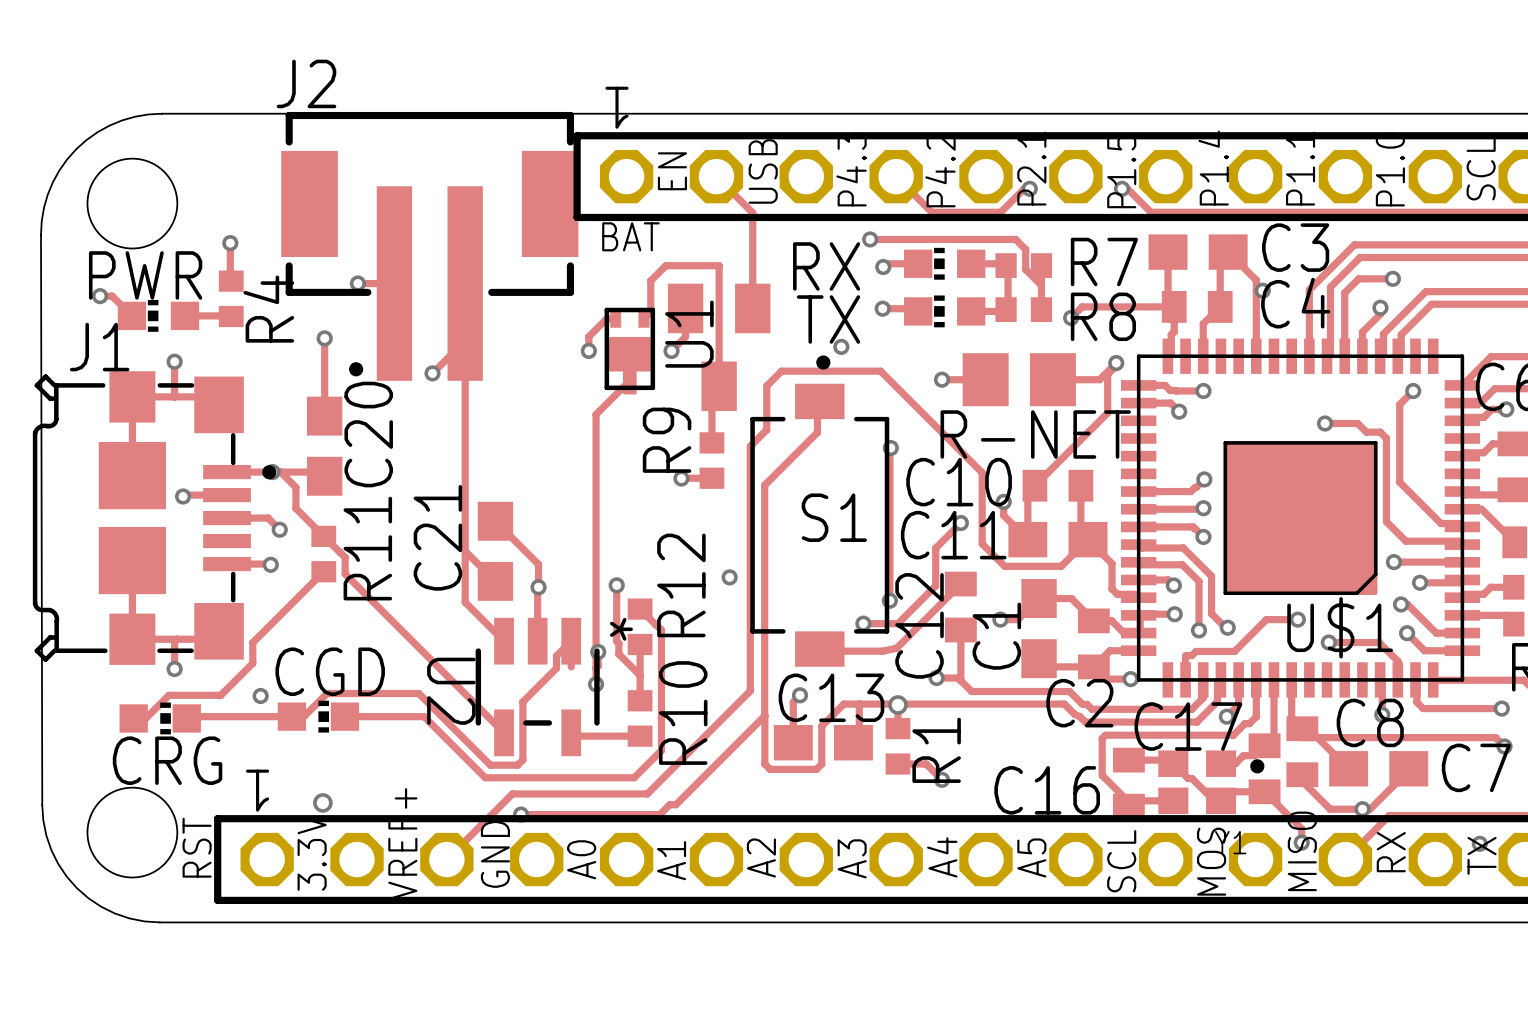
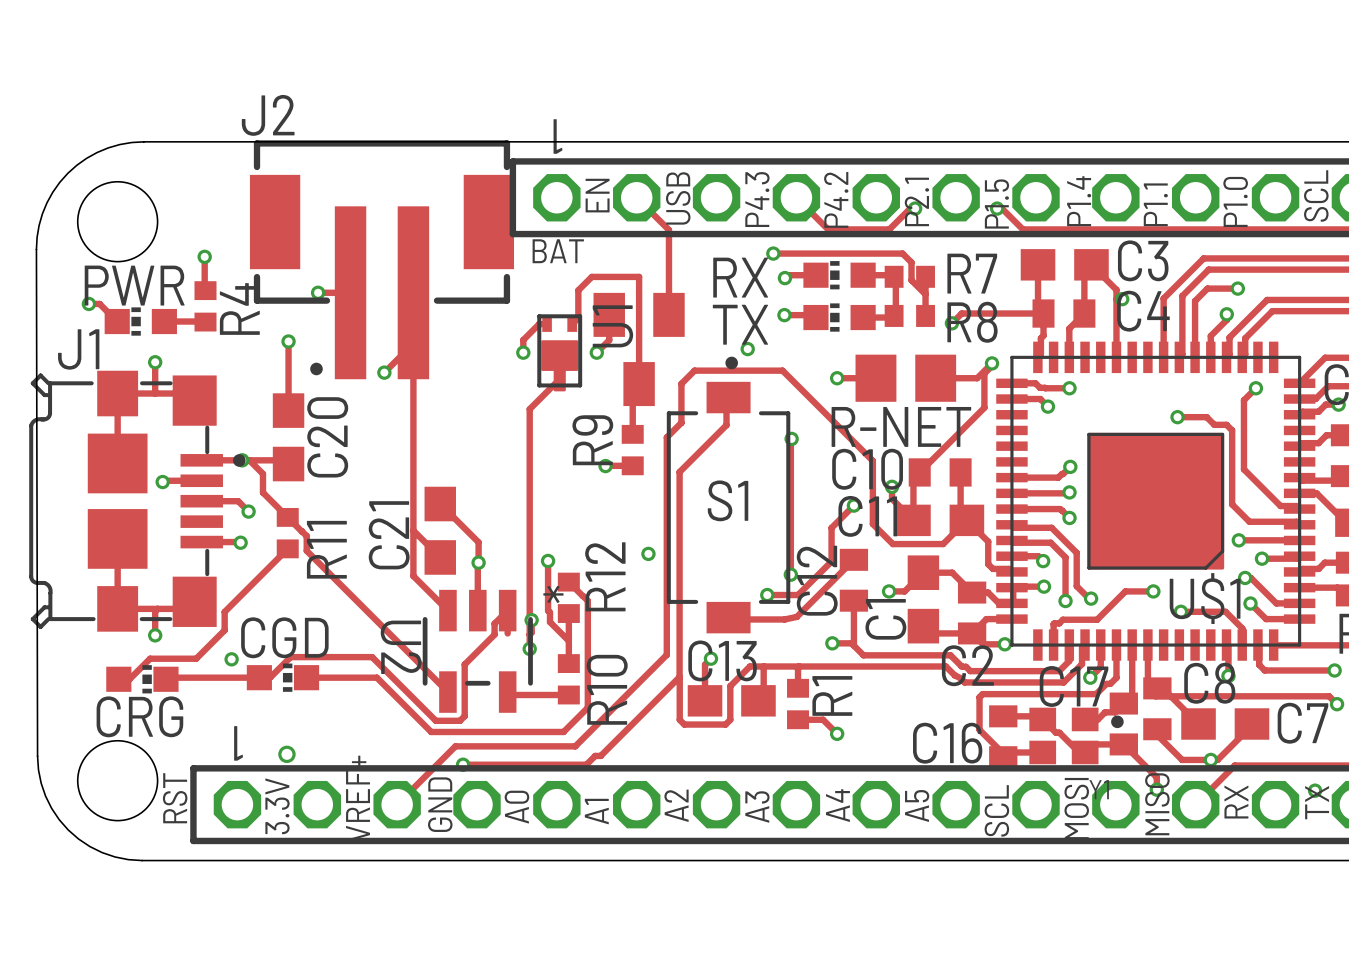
via: (897, 704) -> none

